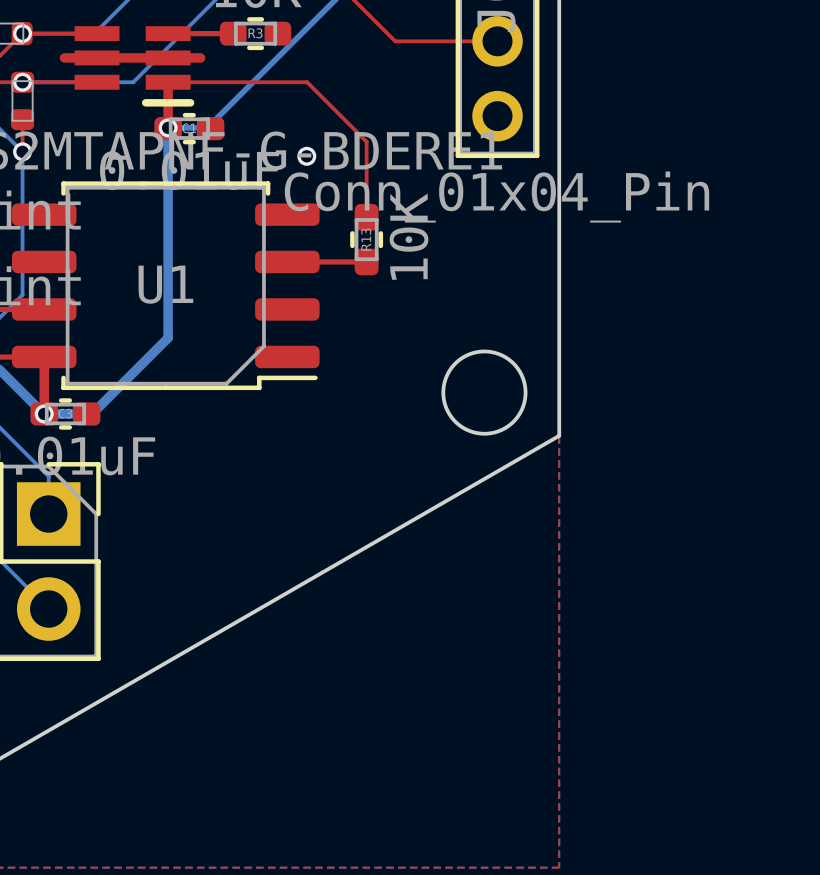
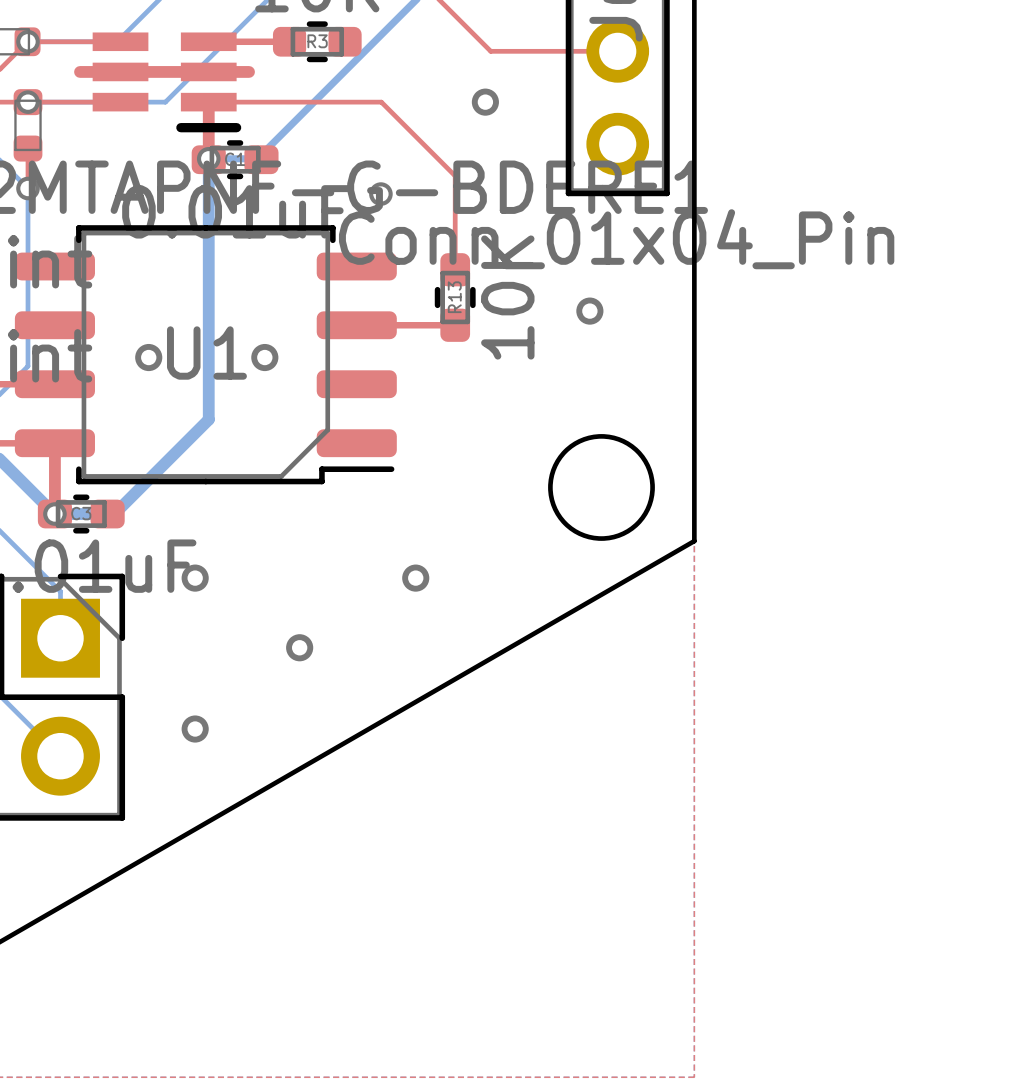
via: none -> (485, 102)
via: none -> (589, 311)
via: none -> (148, 357)
via: none -> (264, 357)
via: none -> (195, 578)
via: none -> (415, 578)
via: none -> (299, 647)
via: none -> (195, 729)

